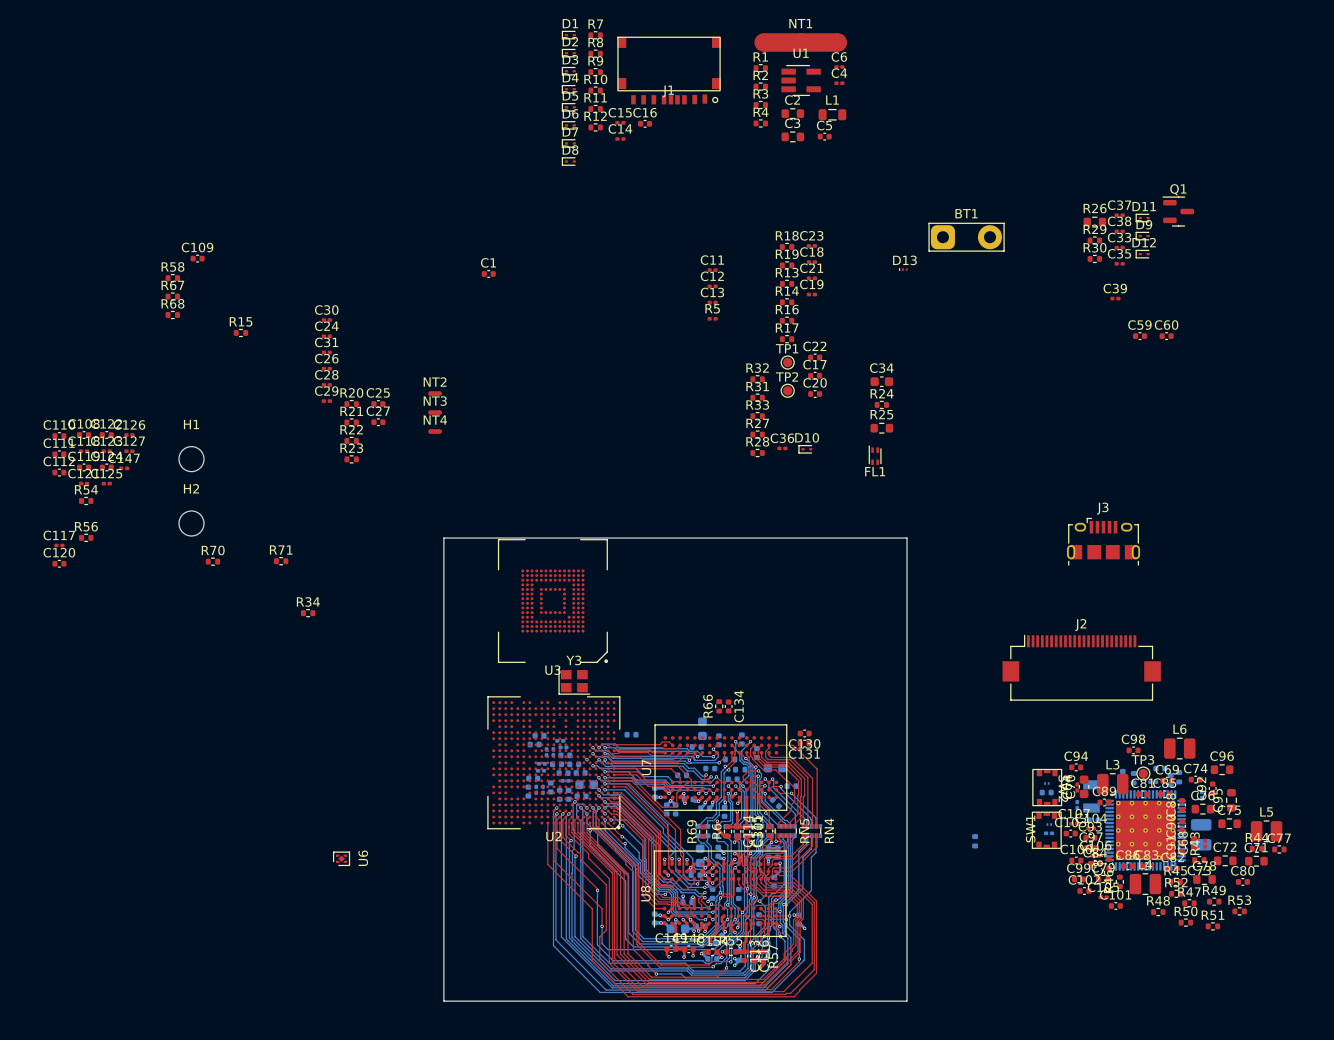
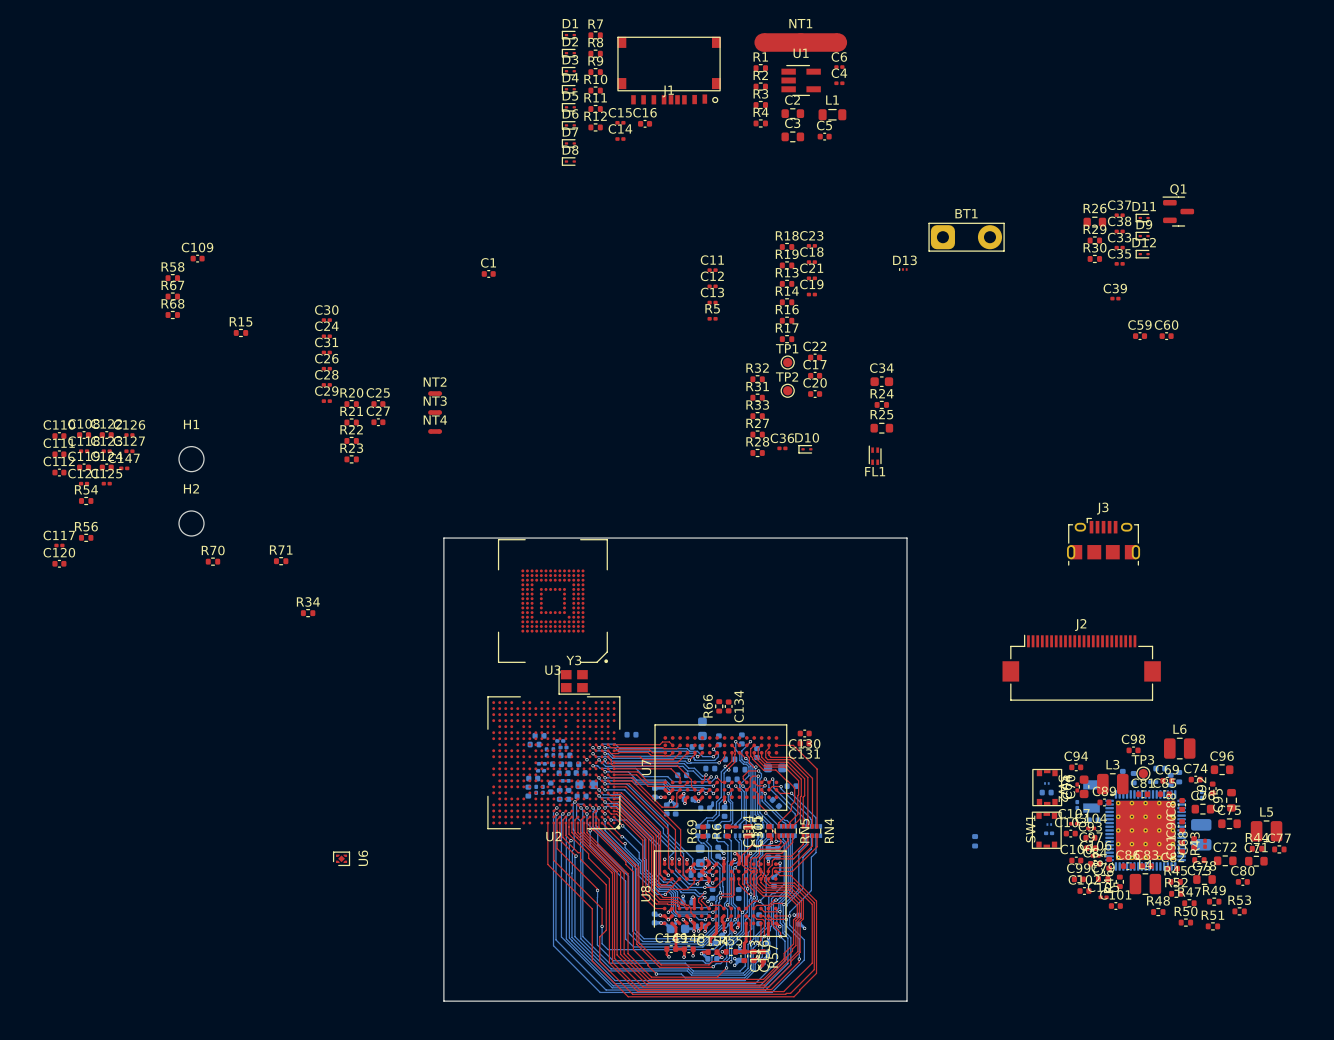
top track: (735, 793) (731, 797) -> none
via: (735, 793) -> none
top track: (709, 797) (705, 802) -> none
top track: (717, 797) (712, 802) -> none
top track: (739, 797) (737, 803) -> none
top track: (746, 797) (746, 827) (737, 826) (737, 811) -> none
top track: (761, 797) (761, 802) (769, 810) (769, 826) -> none
bottom track: (705, 802) (700, 808) -> none
via: (705, 802) -> none
via: (712, 802) -> none
via: (737, 803) -> none
via: (737, 811) -> none
top track: (717, 821) (717, 829) (724, 836) (727, 836) -> none
via: (717, 821) -> none
C114 position: (737, 831) -> (750, 831)
top track: (737, 835) (734, 842) -> none
top track: (746, 836) (750, 842) -> none
via: (734, 842) -> none
via: (750, 842) -> none

